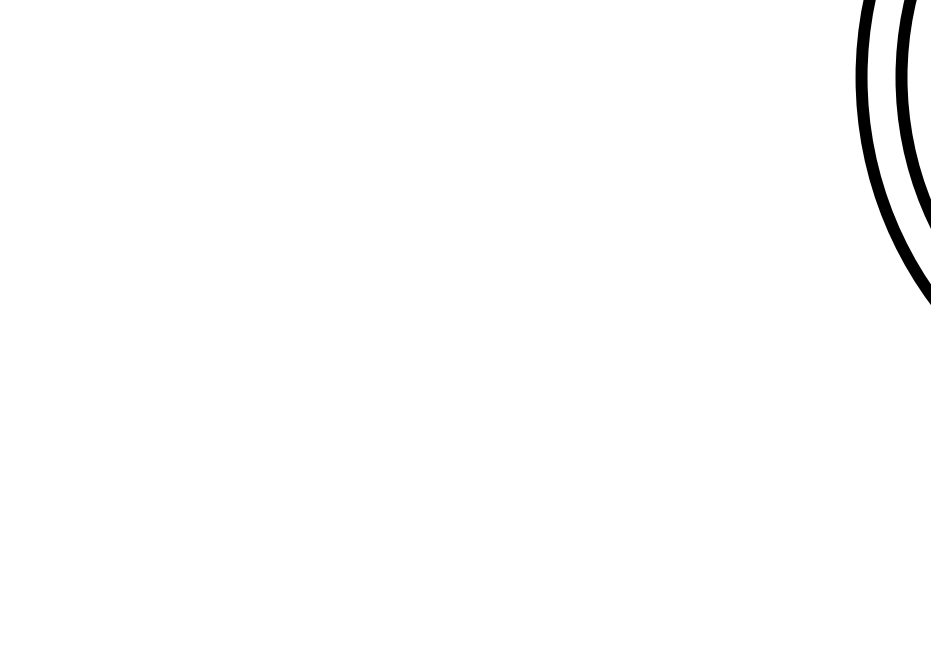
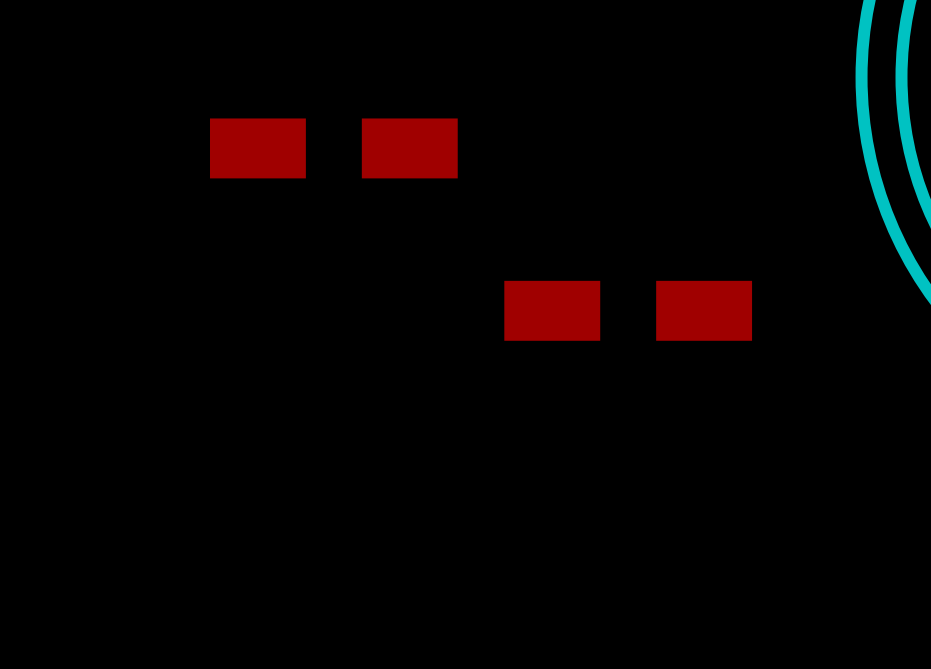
part: none -> (333, 148)
part: none -> (628, 310)

